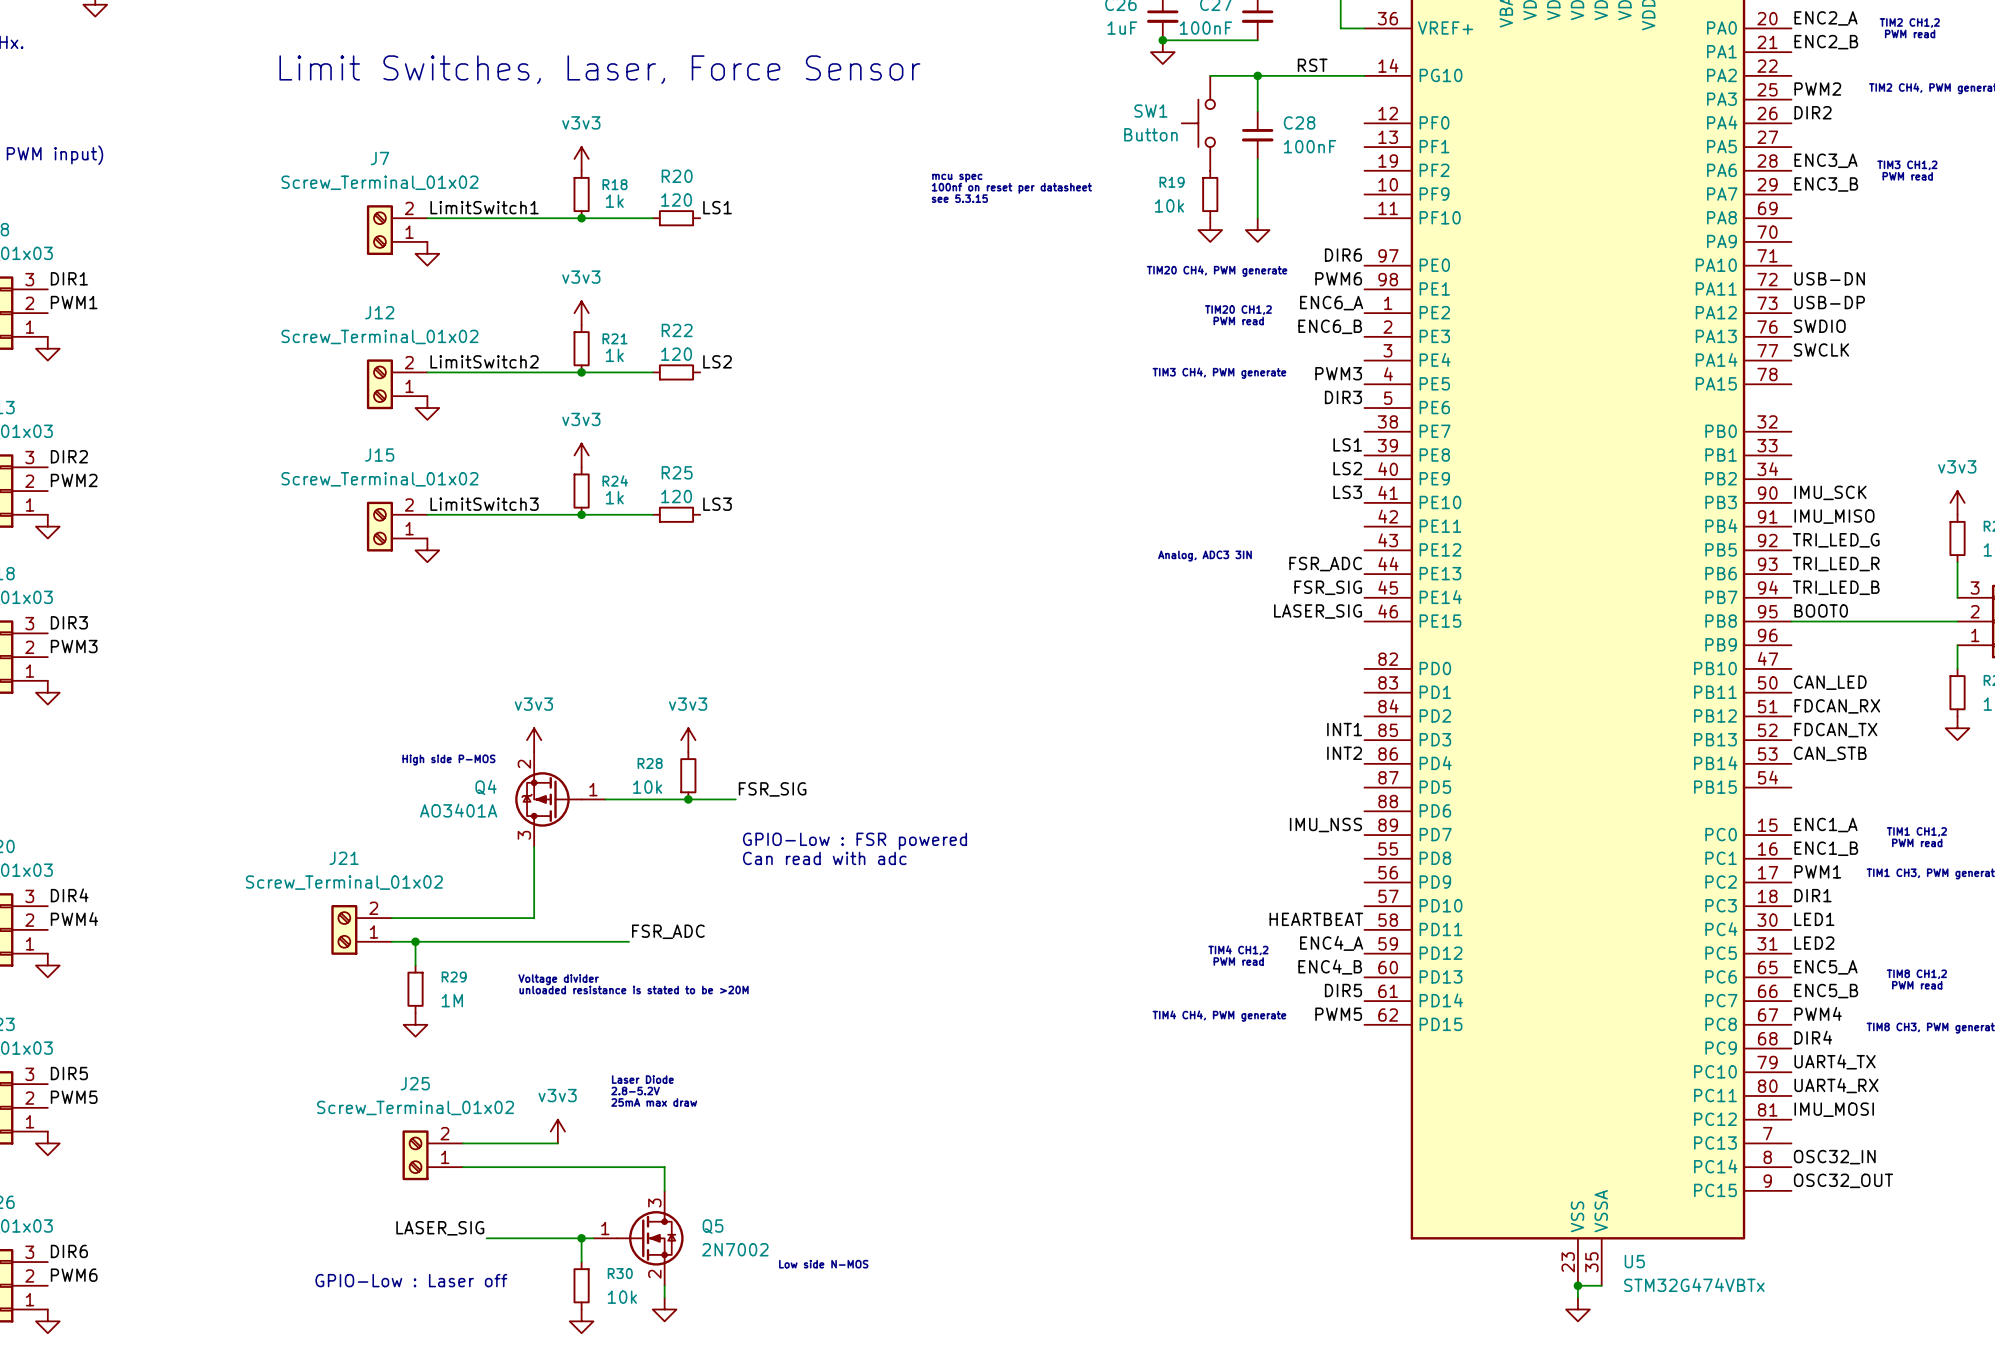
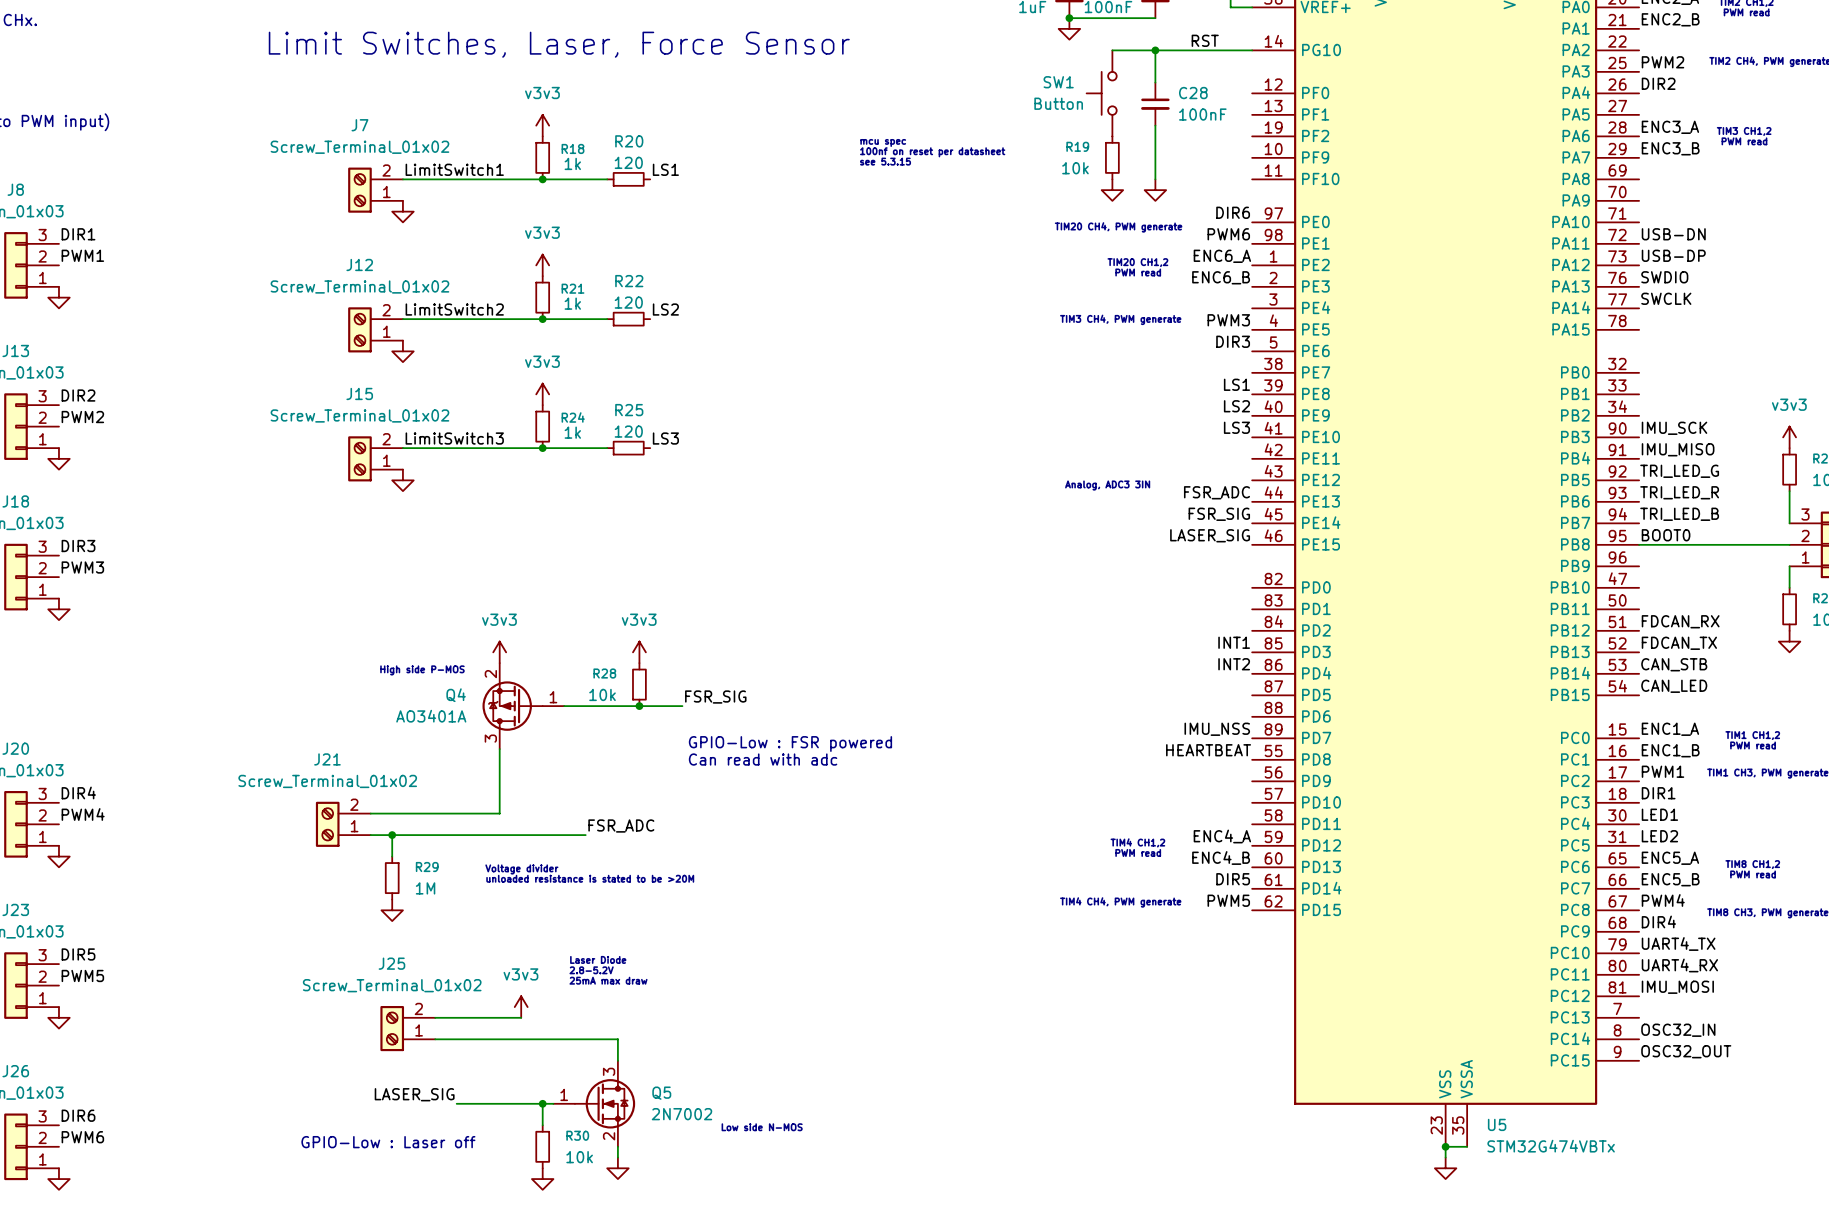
label position: CAN_LED (1830, 682) -> CAN_LED (1674, 686)
label position: HEARTBEAT (1316, 919) -> HEARTBEAT (1208, 750)

